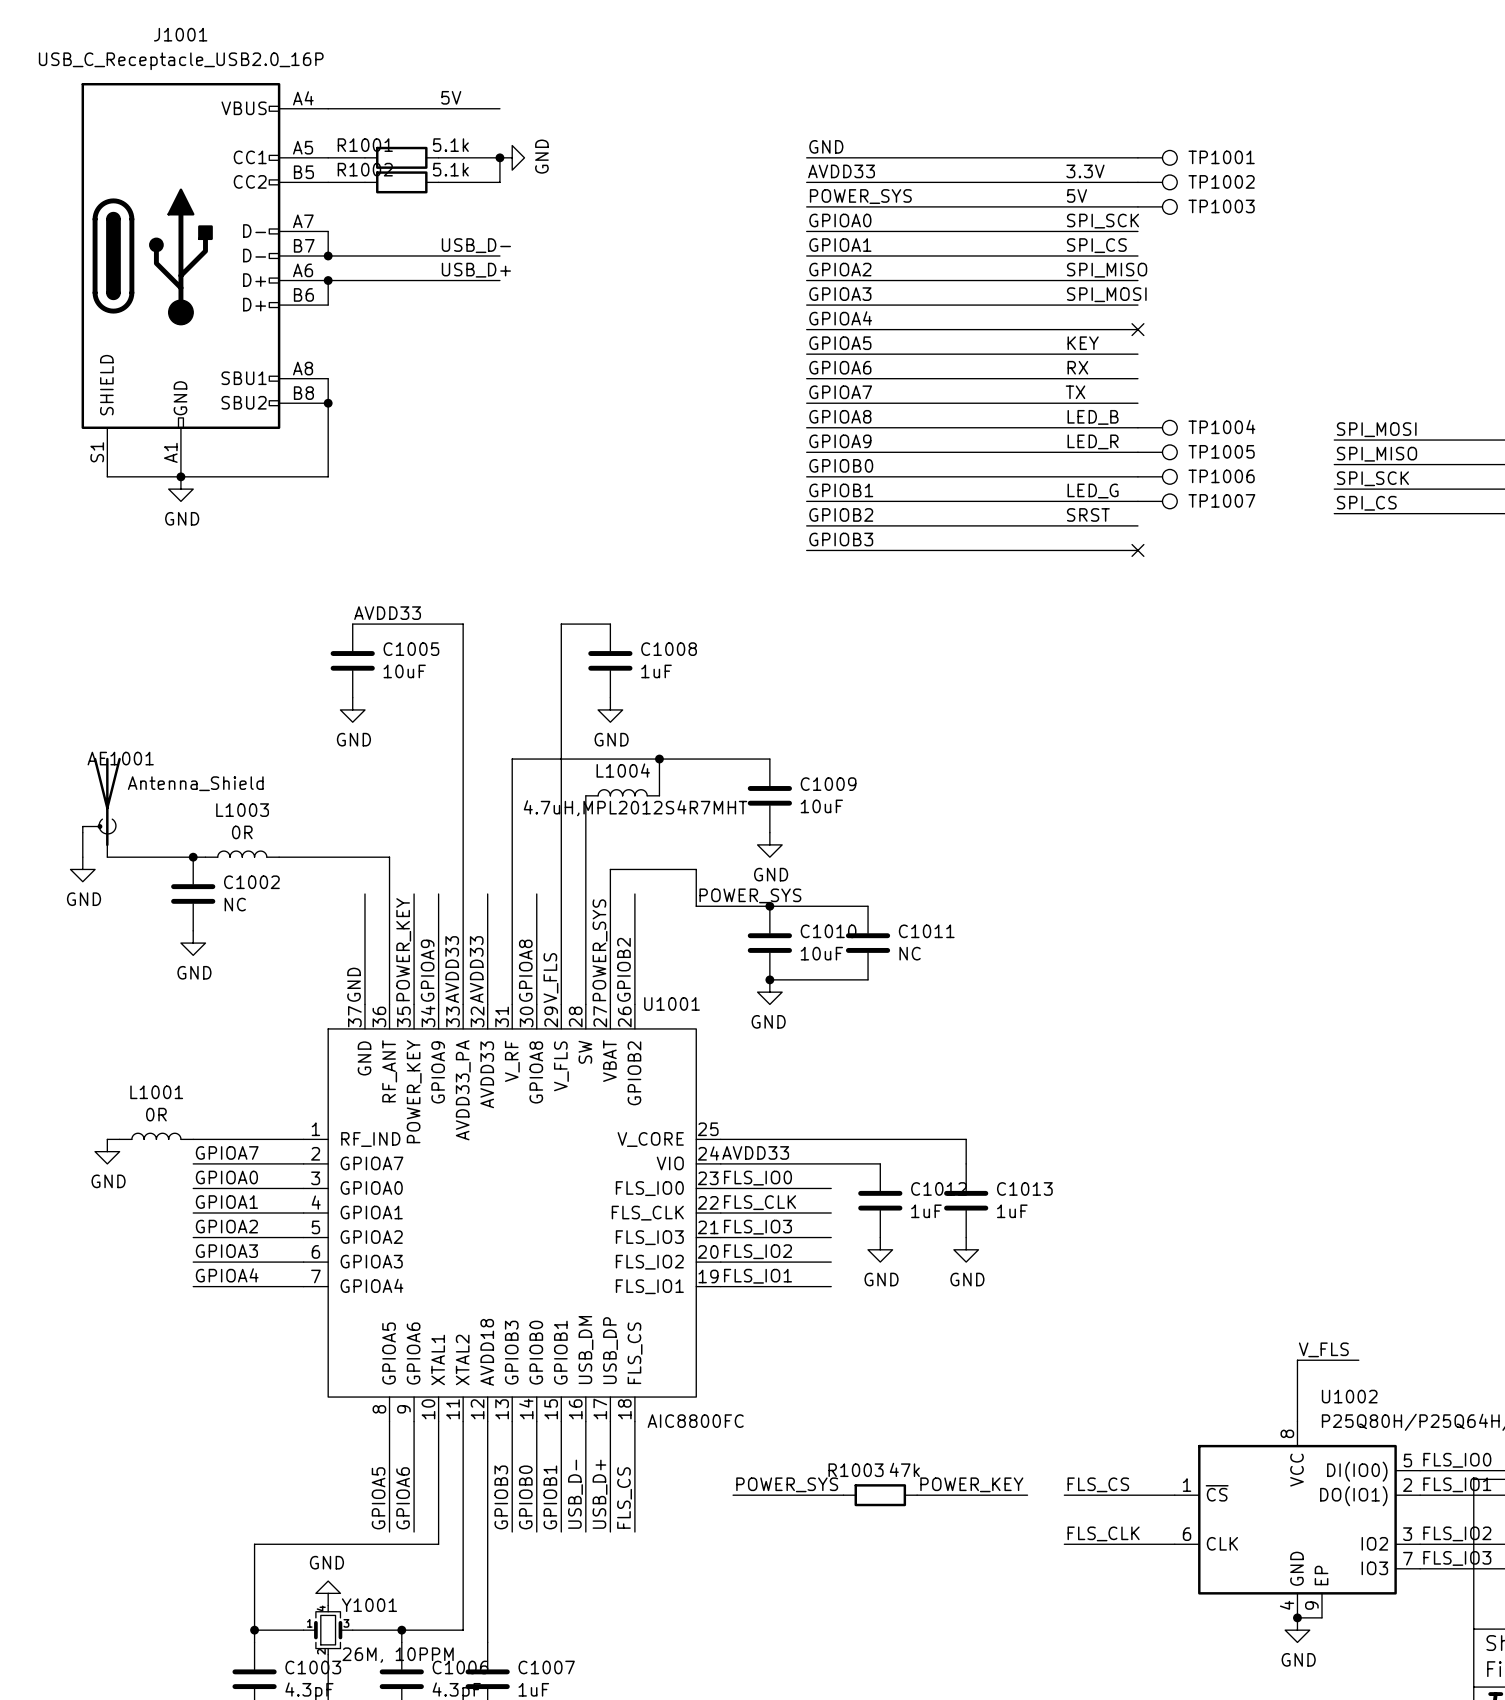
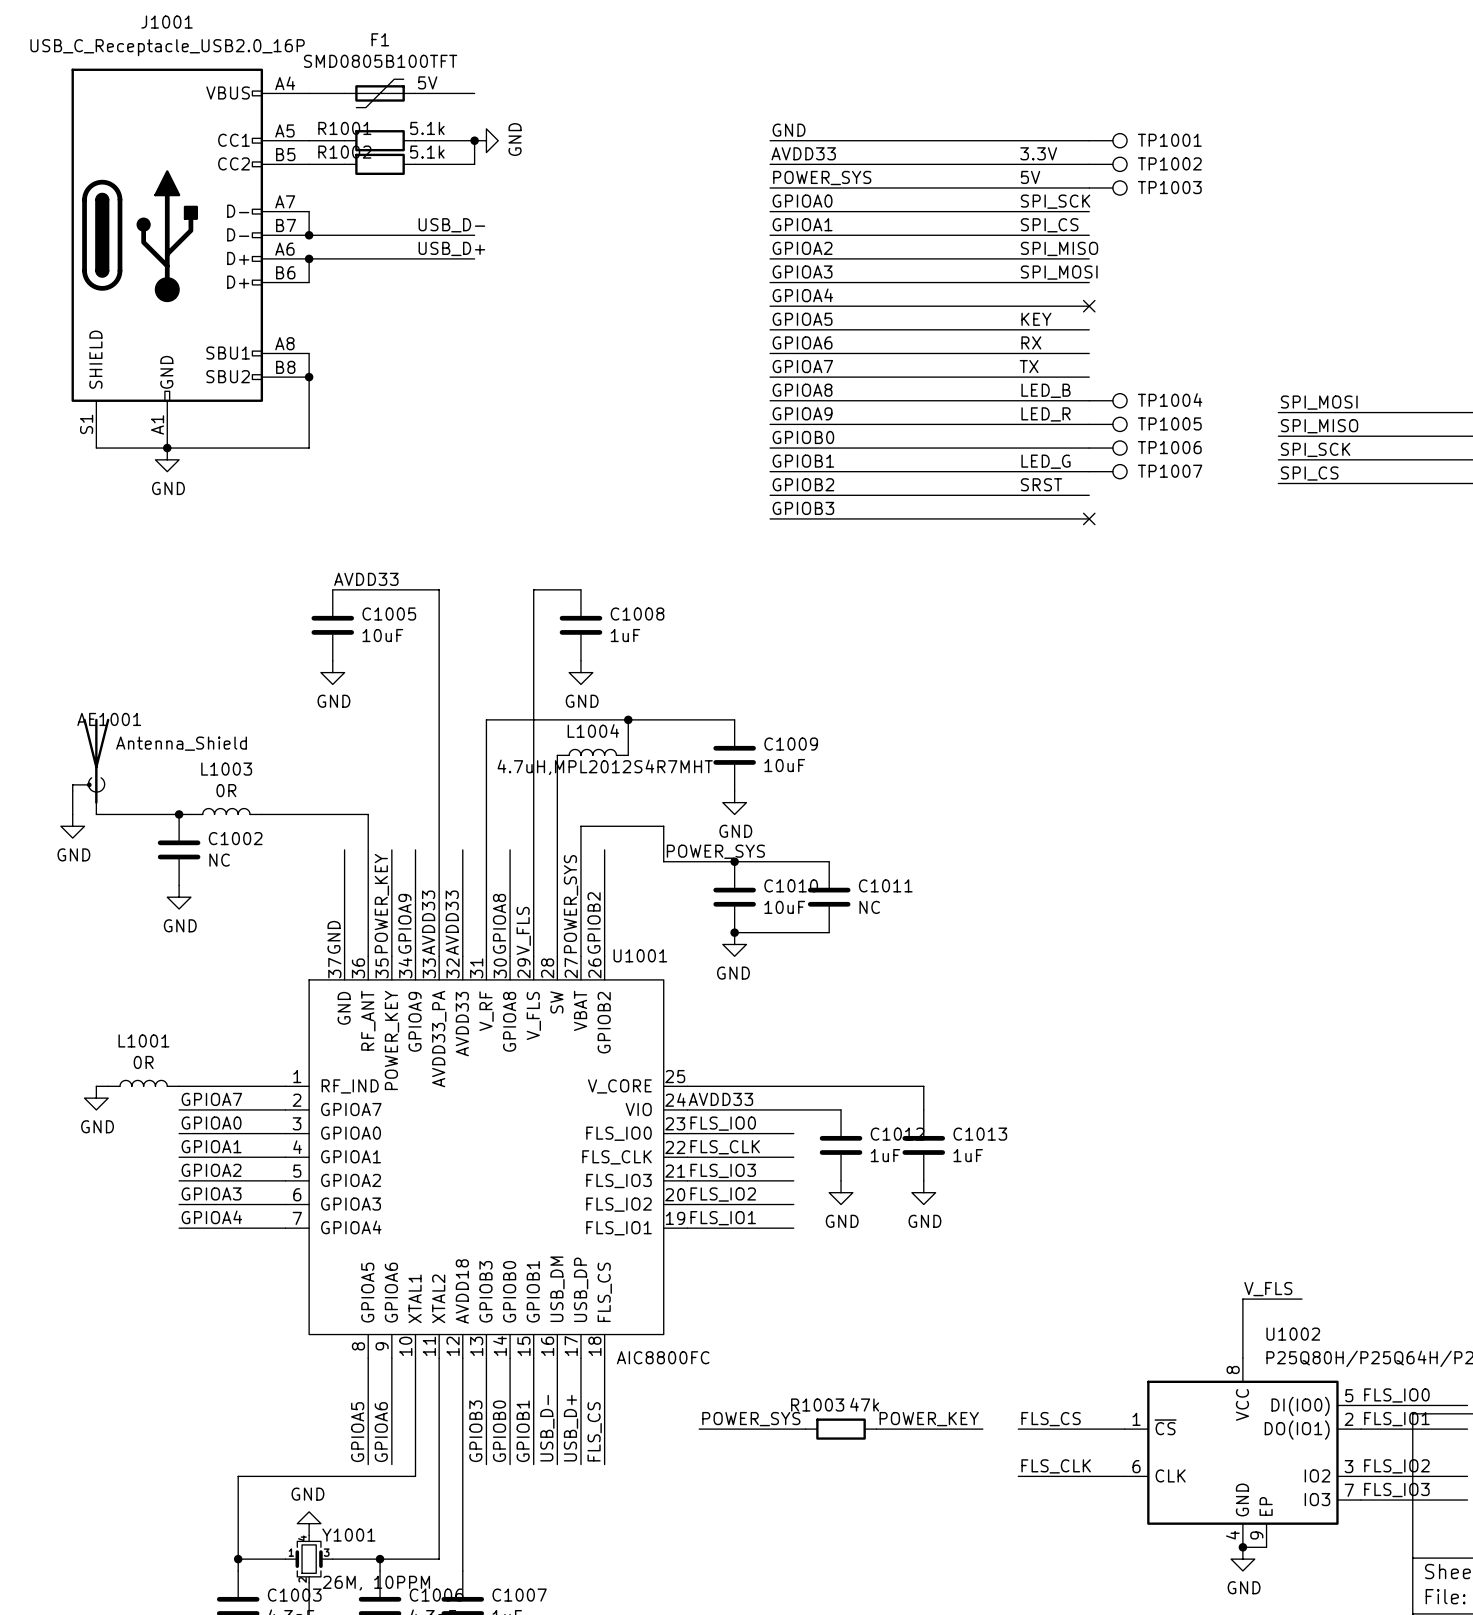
F1: none -> SMD0805B100TFT (380, 93)

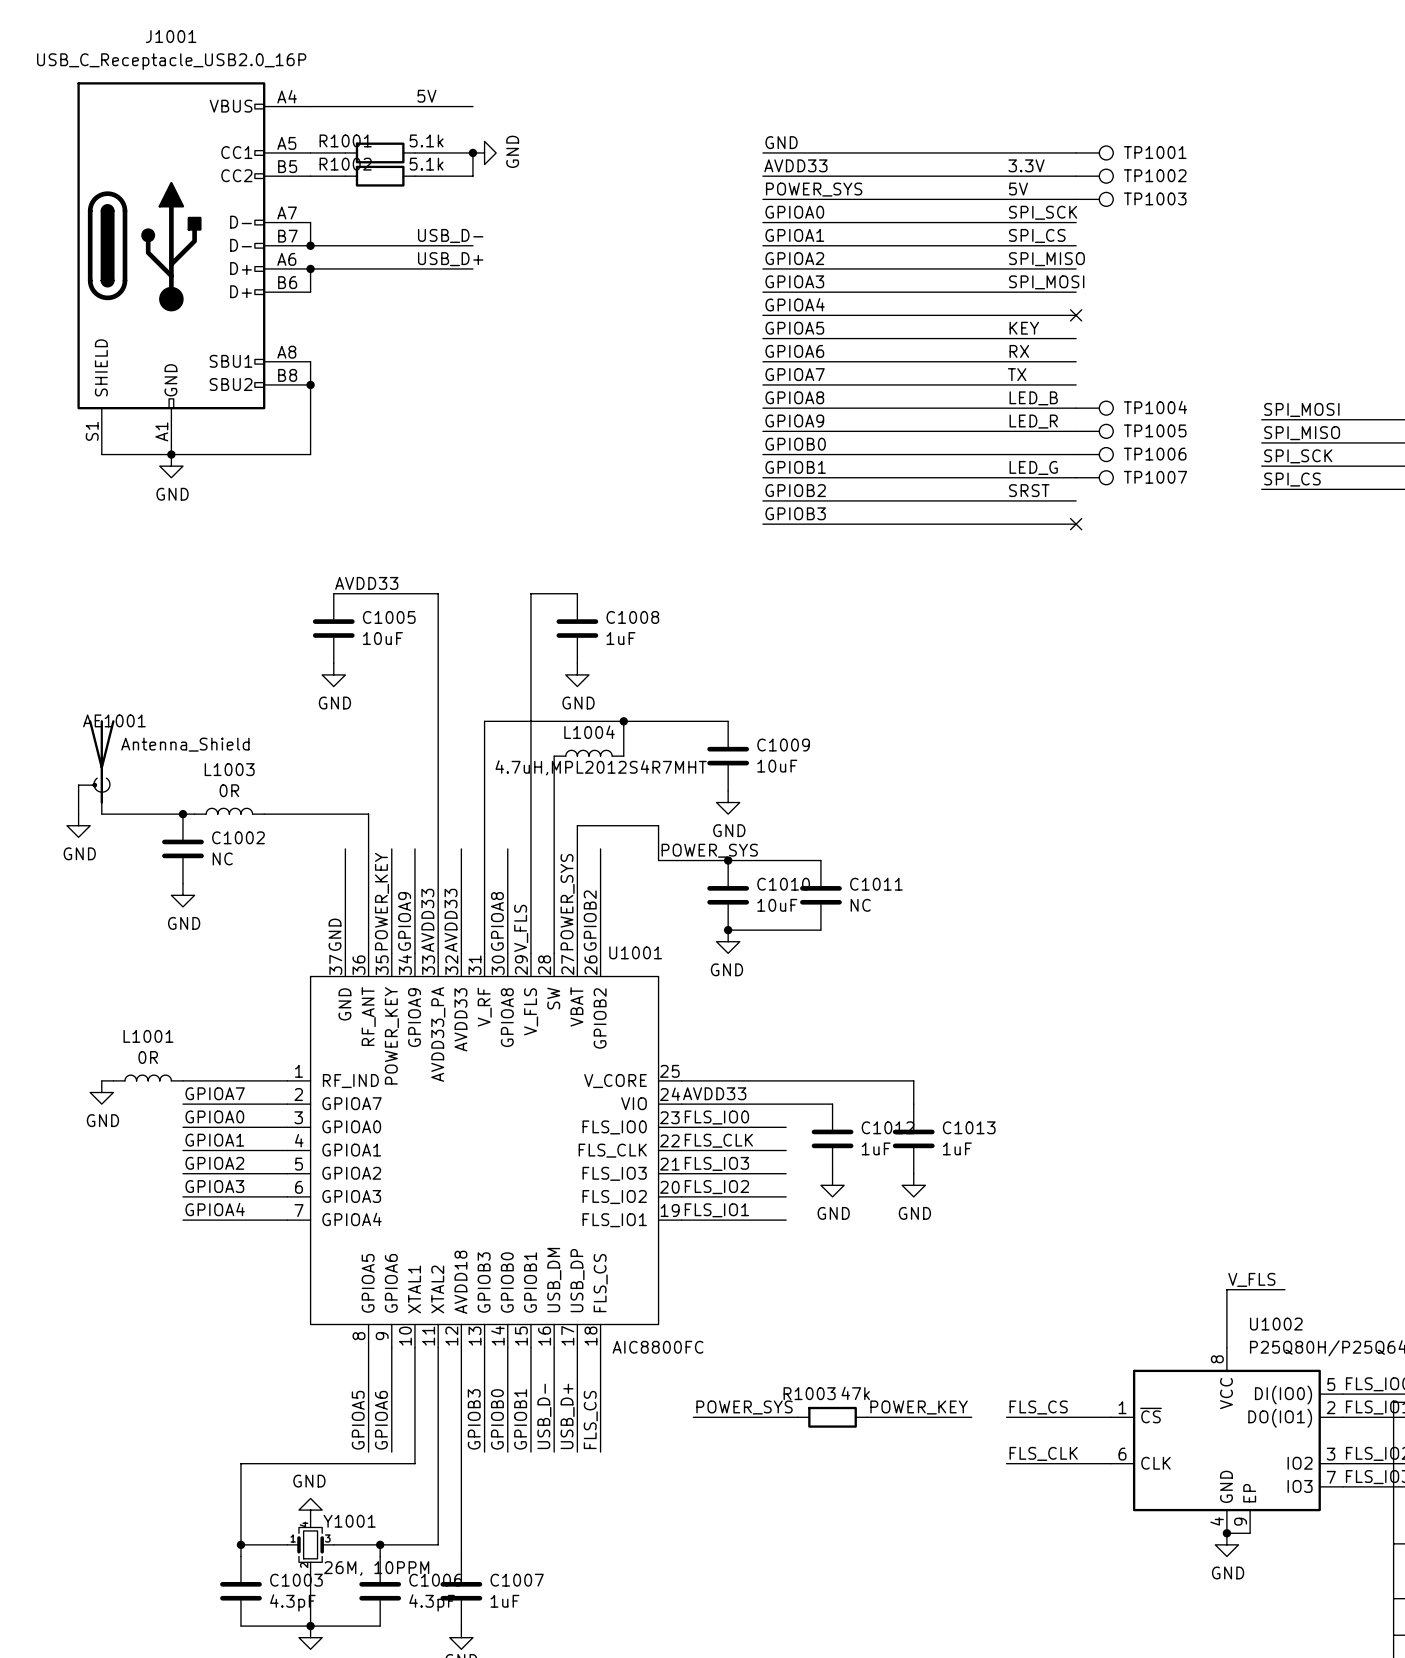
F1: SMD0805B100TFT (380, 93) -> none

